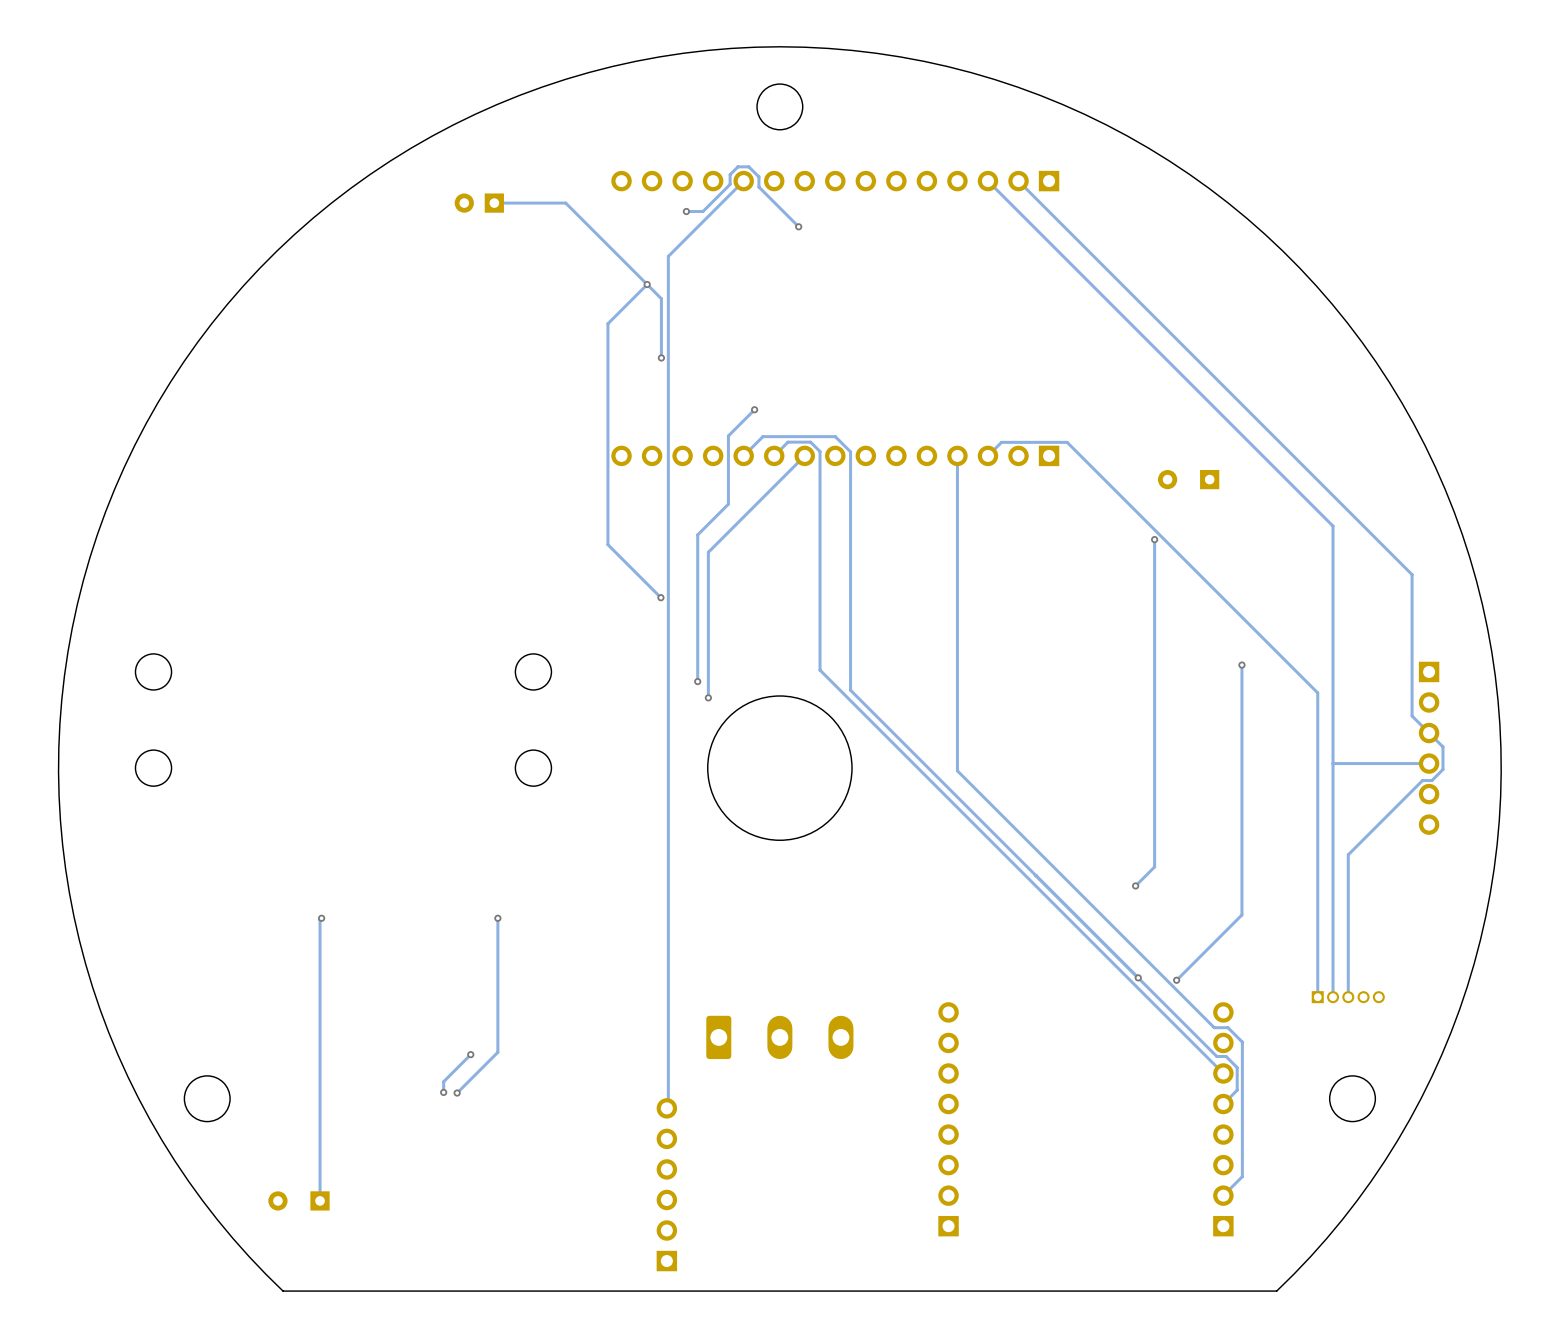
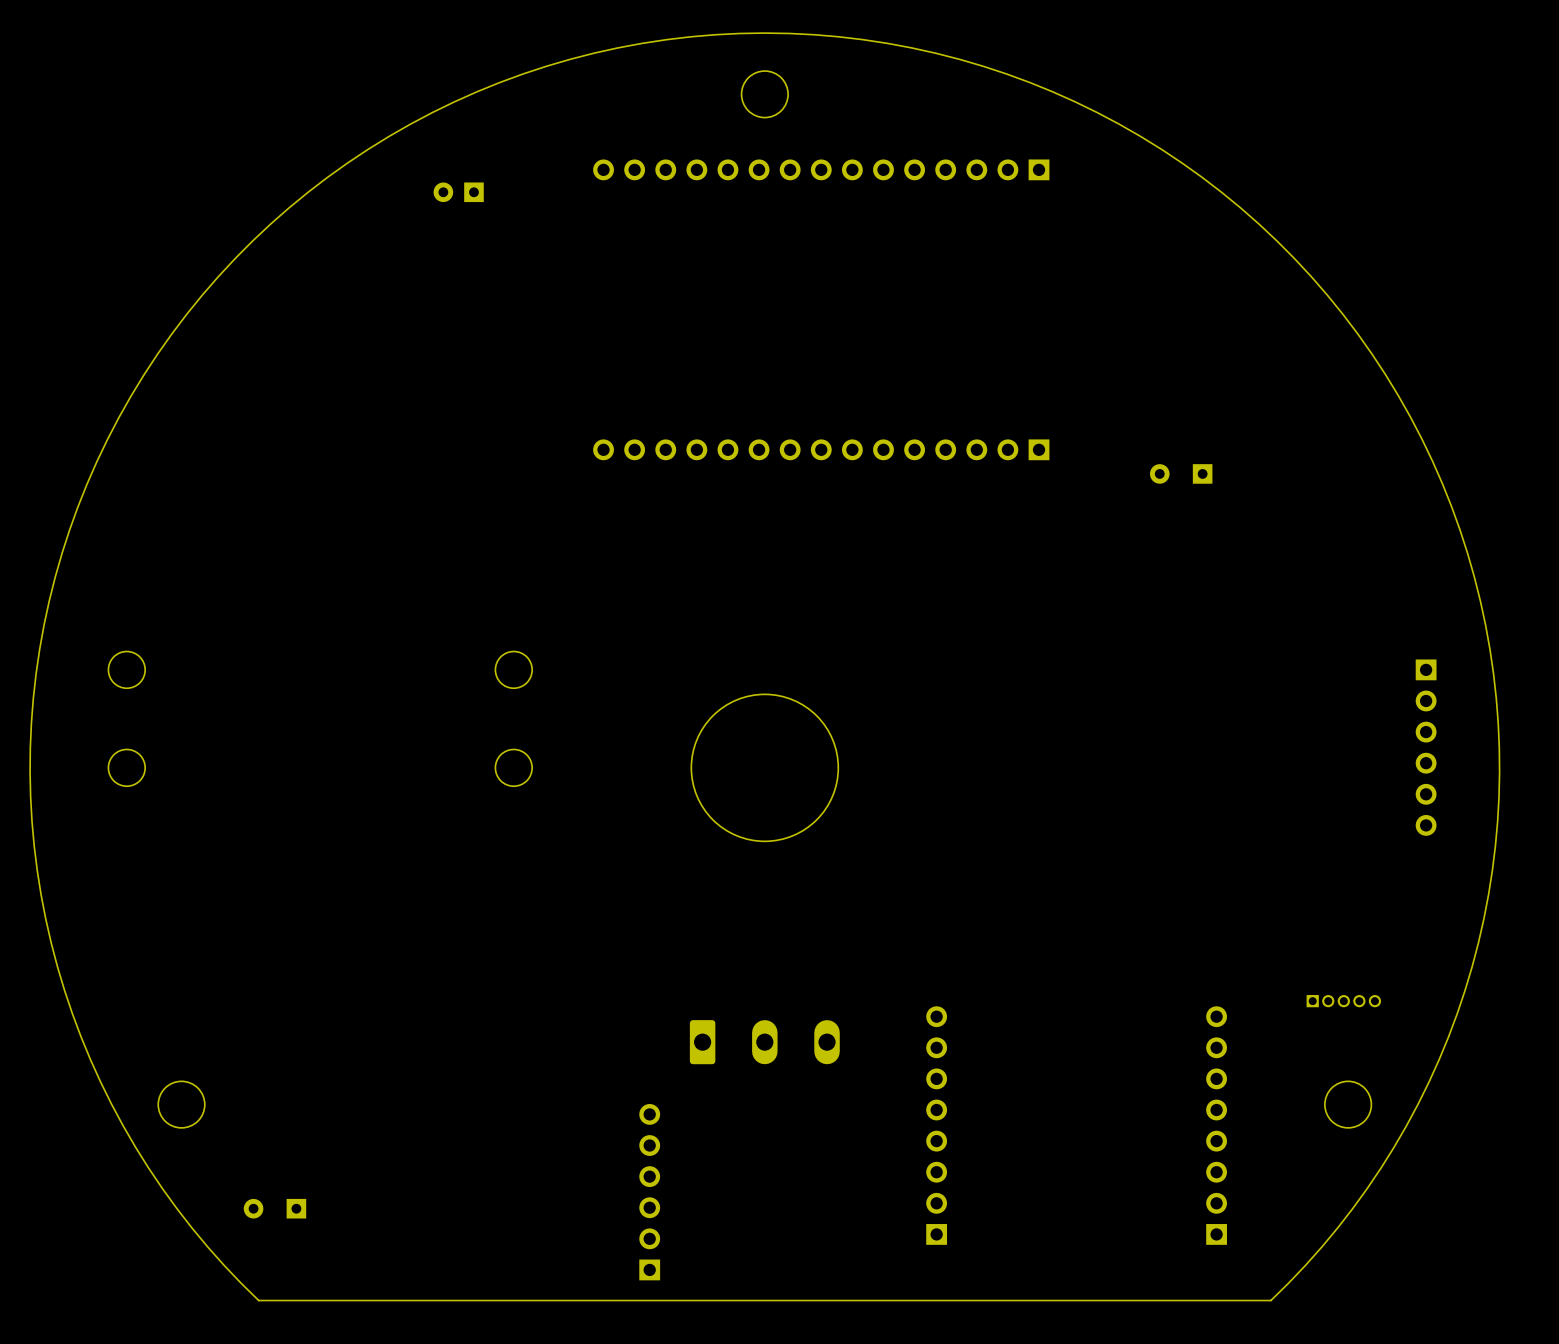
track: (743, 181) (668, 256) (666, 1108) -> none
track: (987, 181) (1333, 526) (1333, 997) -> none
track: (1018, 181) (1412, 574) (1412, 716) (1442, 746) (1442, 769) (1431, 780) (1422, 780) (1348, 854) (1348, 997) -> none
track: (494, 203) (565, 203) (661, 298) (661, 357) -> none
track: (686, 211) (702, 211) (730, 184) (730, 174) (737, 166) (748, 166) (758, 176) (758, 187) (798, 226) -> none
via: (686, 211) -> none
via: (798, 226) -> none
track: (647, 284) (607, 323) (607, 544) (660, 597) -> none
via: (647, 284) -> none
via: (661, 357) -> none
track: (754, 409) (728, 435) (728, 504) (697, 534) (697, 681) -> none
via: (754, 409) -> none
track: (743, 455) (762, 436) (835, 436) (850, 451) (850, 690) (1035, 875) -> none
track: (774, 455) (787, 442) (810, 442) (820, 451) (820, 670) (1223, 1073) -> none
track: (804, 455) (708, 552) (708, 697) -> none
track: (957, 455) (957, 770) (1214, 1027) (1227, 1027) (1242, 1042) (1242, 1176) (1223, 1195) -> none
track: (987, 455) (1001, 442) (1067, 442) (1317, 692) (1317, 997) -> none
track: (1154, 539) (1154, 866) (1135, 885) -> none
via: (1154, 539) -> none
via: (660, 597) -> none
track: (1241, 665) (1241, 914) (1176, 980) -> none
via: (1241, 665) -> none
via: (697, 681) -> none
via: (708, 697) -> none
track: (1429, 763) (1333, 763) -> none
track: (1036, 875) (1216, 1056) (1226, 1056) (1237, 1067) (1237, 1090) (1223, 1104) -> none
via: (1135, 885) -> none
track: (321, 918) (320, 919) (320, 1200) -> none
via: (321, 918) -> none
track: (497, 918) (497, 1052) (457, 1093) -> none
via: (497, 918) -> none
via: (1138, 977) -> none
via: (1176, 980) -> none
track: (470, 1054) (443, 1081) (443, 1092) -> none
via: (470, 1054) -> none
via: (443, 1092) -> none
via: (457, 1093) -> none

